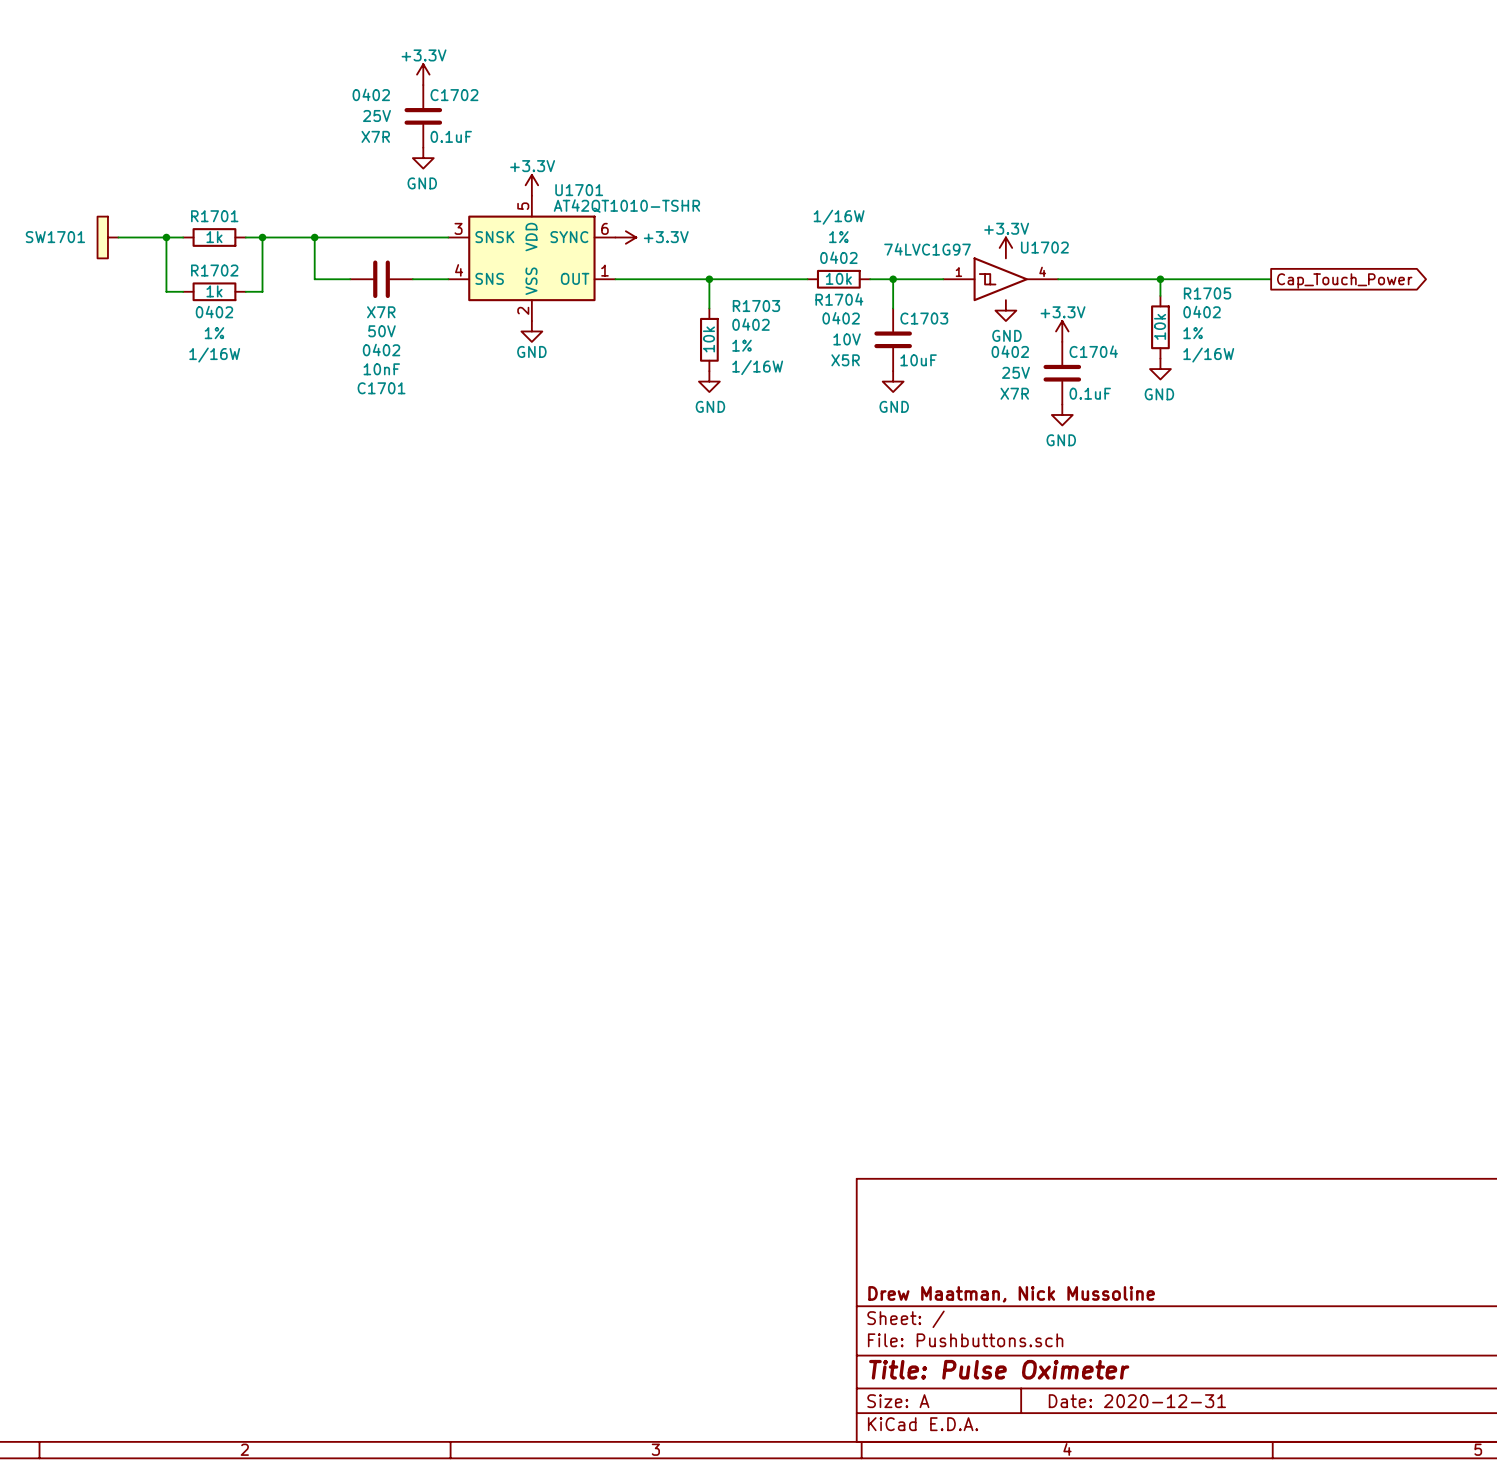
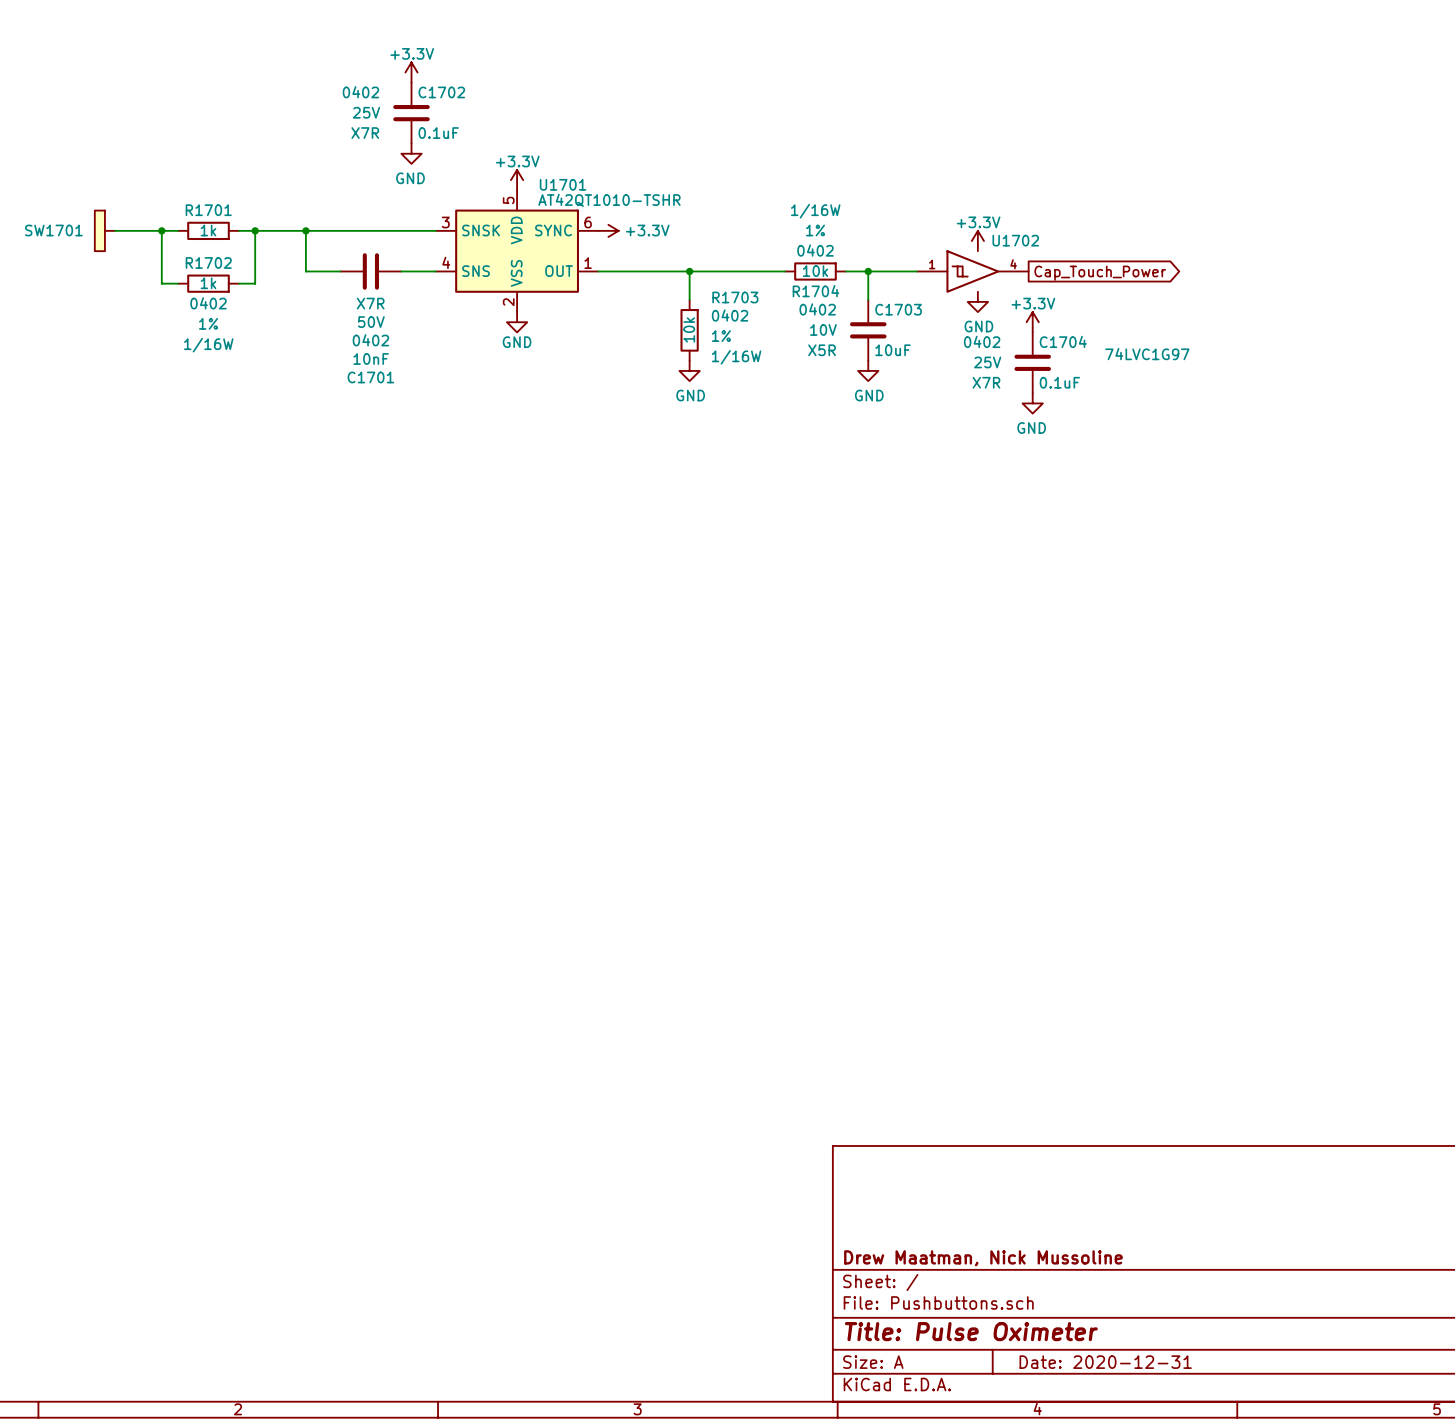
U1702 value position: 74LVC1G97 (927, 249) -> 74LVC1G97 (1147, 354)
wire: (1058, 279) (1271, 279) -> none
wire: (1160, 279) (1160, 295) -> none
junction: (1160, 279) -> none
global label: none -> Cap_Touch_Power (1100, 273)
global label: Cap_Touch_Power (1344, 281) -> none
R1705: 10k (1160, 327) -> none
power symbol: GND (1160, 369) -> none

